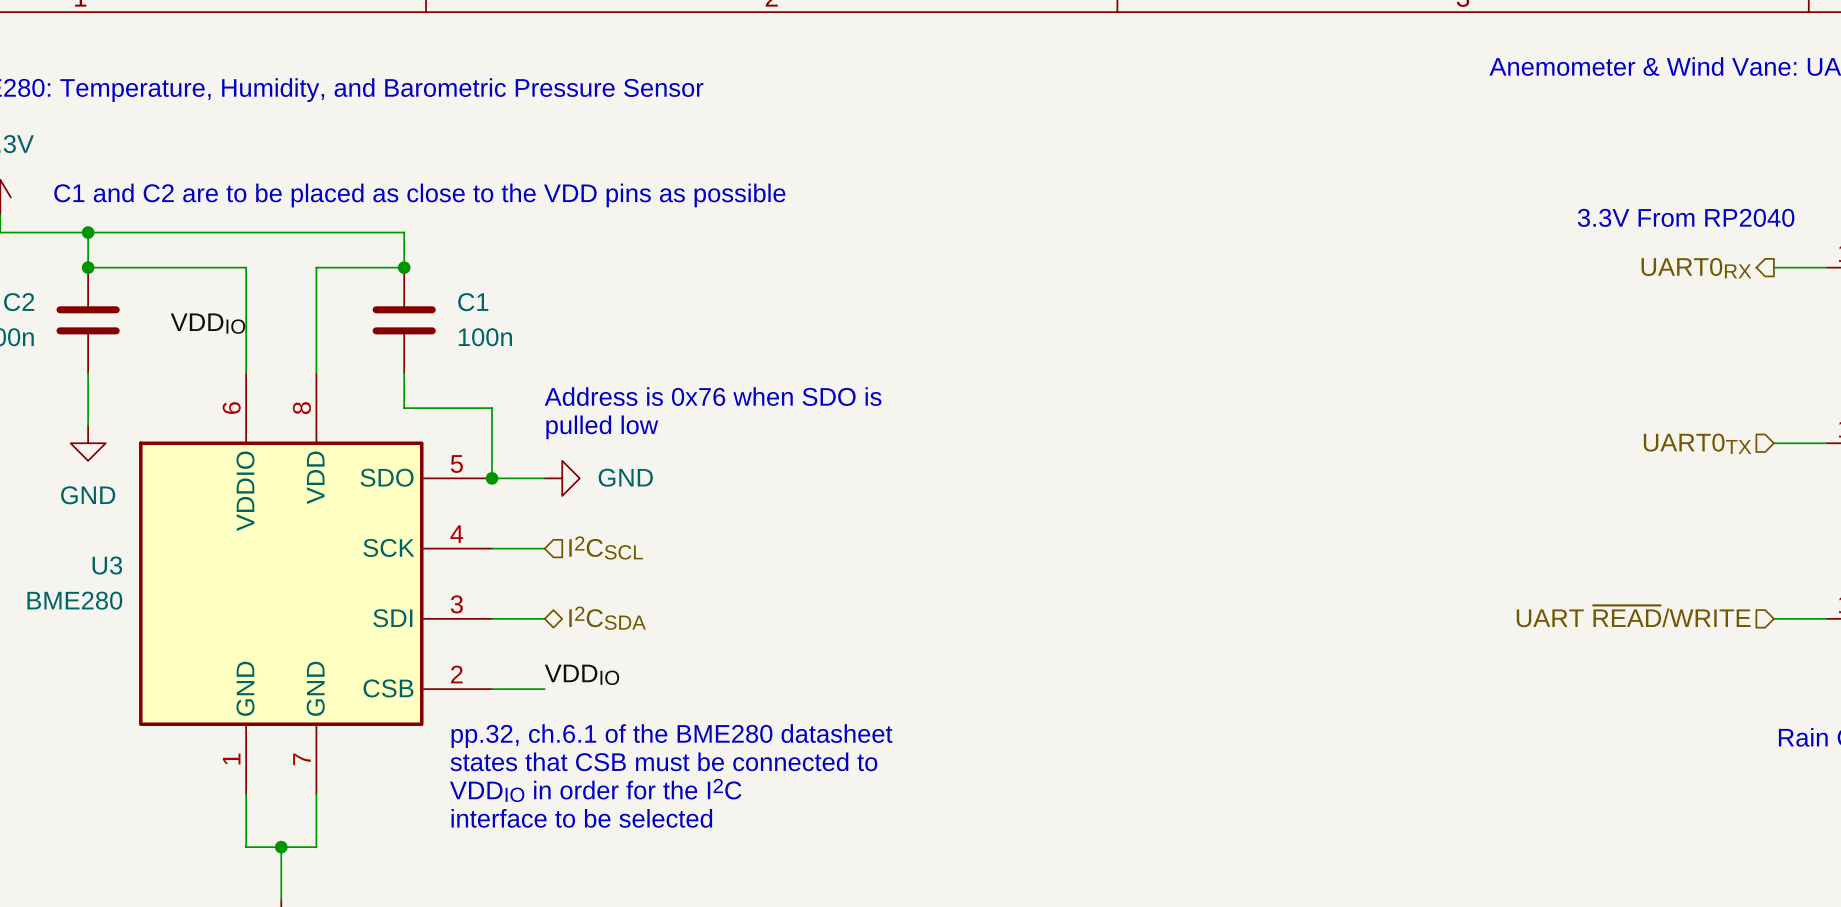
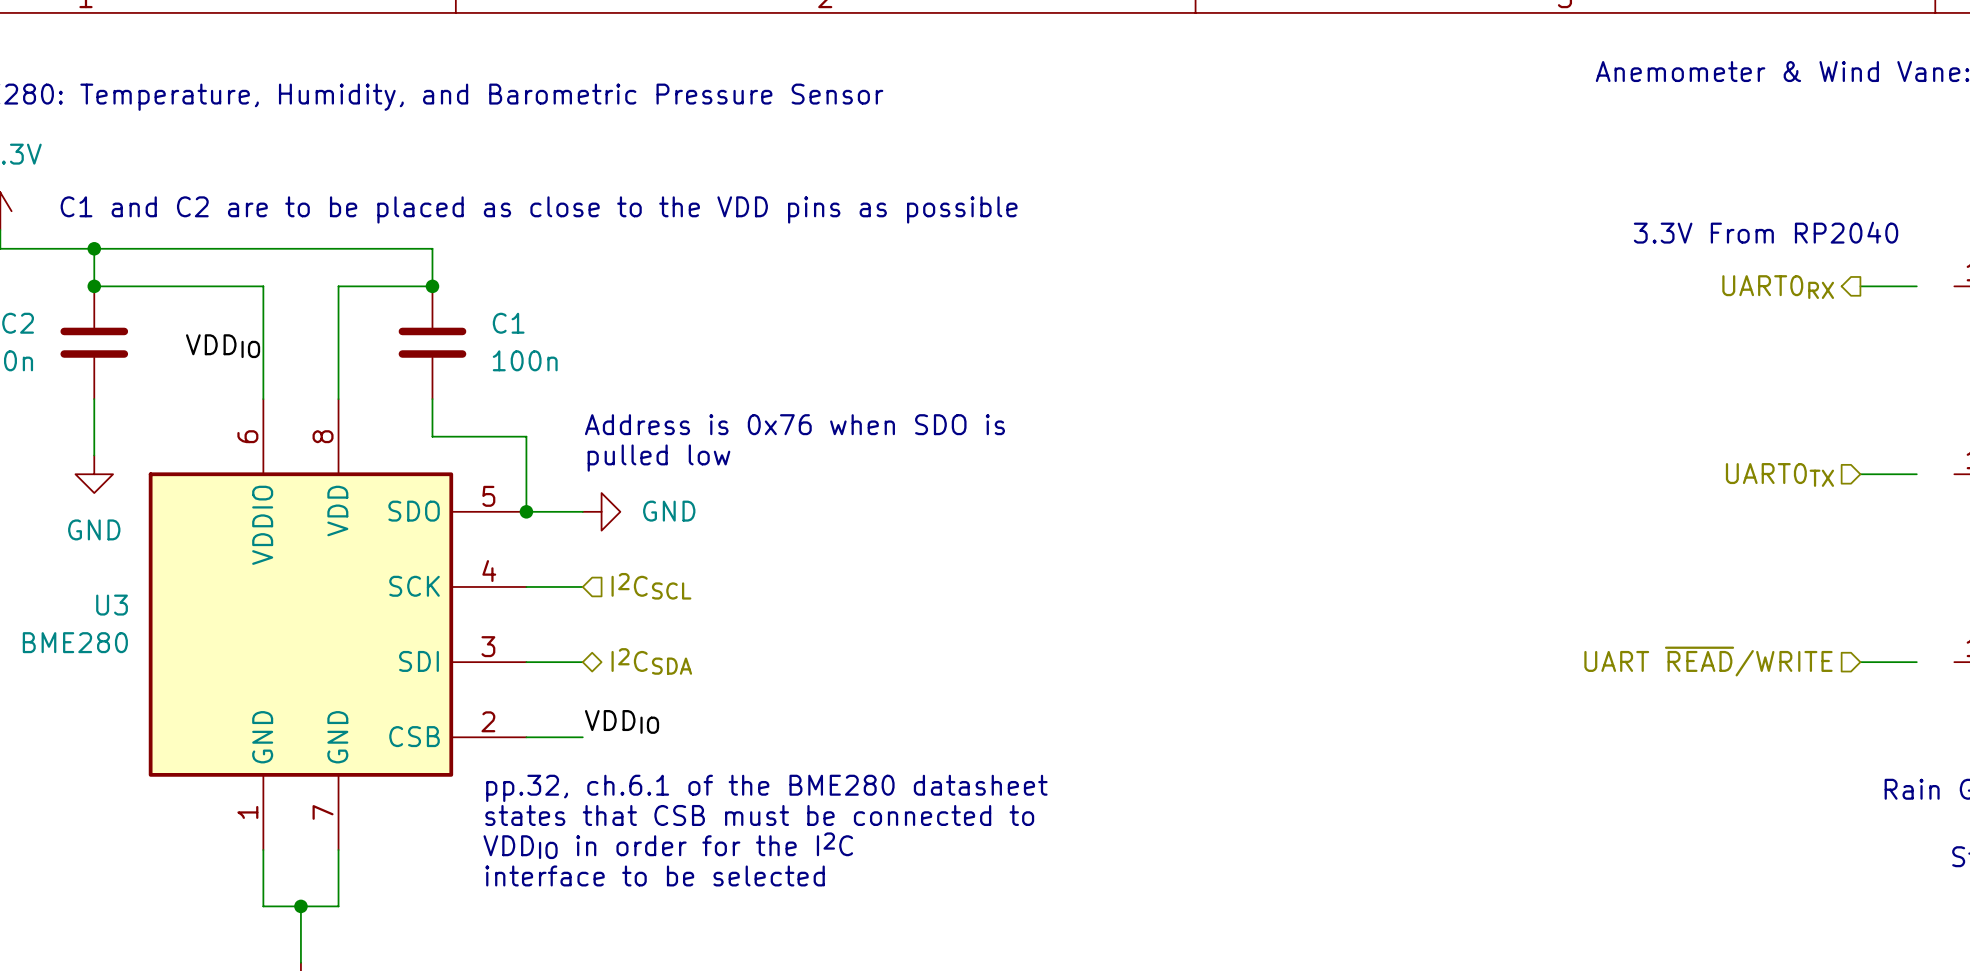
text position: 3.3V From RP2040 (1686, 217) -> 3.3V From RP2040 (1766, 232)
wire: (1791, 267) (1826, 267) -> (1860, 286) (1897, 286)
hierarchical label position: UART0RX (1696, 268) -> UART0RX (1778, 287)
hierarchical label position: UART0TX (1697, 443) -> UART0TX (1779, 474)
wire: (1791, 443) (1826, 443) -> (1860, 474) (1897, 474)
hierarchical label position: UART ~{READ}/WRITE (1633, 616) -> UART ~{READ}/WRITE (1708, 661)
wire: (1791, 618) (1826, 618) -> (1860, 662) (1897, 662)

